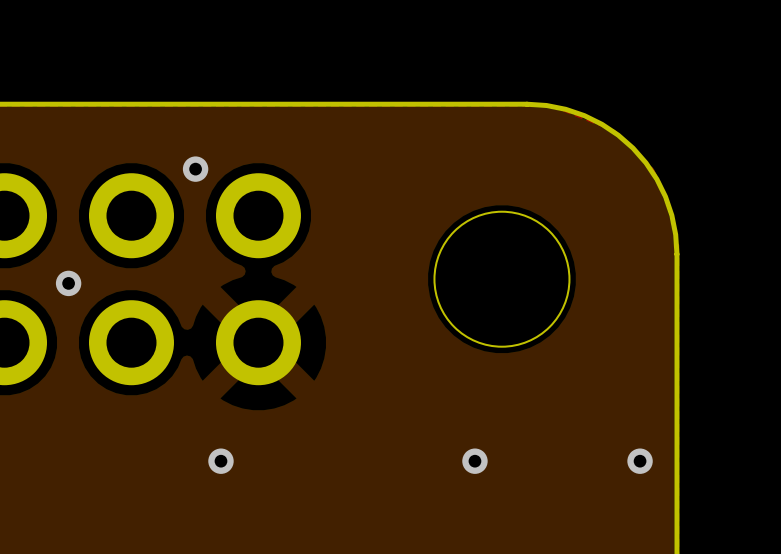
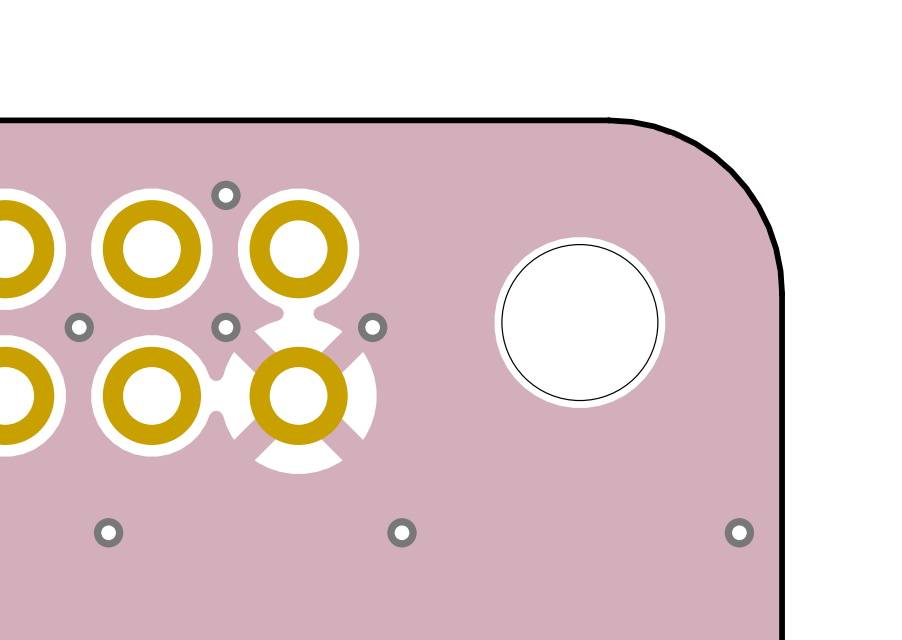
via: none -> (225, 327)
via: none -> (372, 327)
via: none -> (108, 532)
via: (220, 461) -> none
via: none -> (402, 532)
via: (474, 461) -> none

